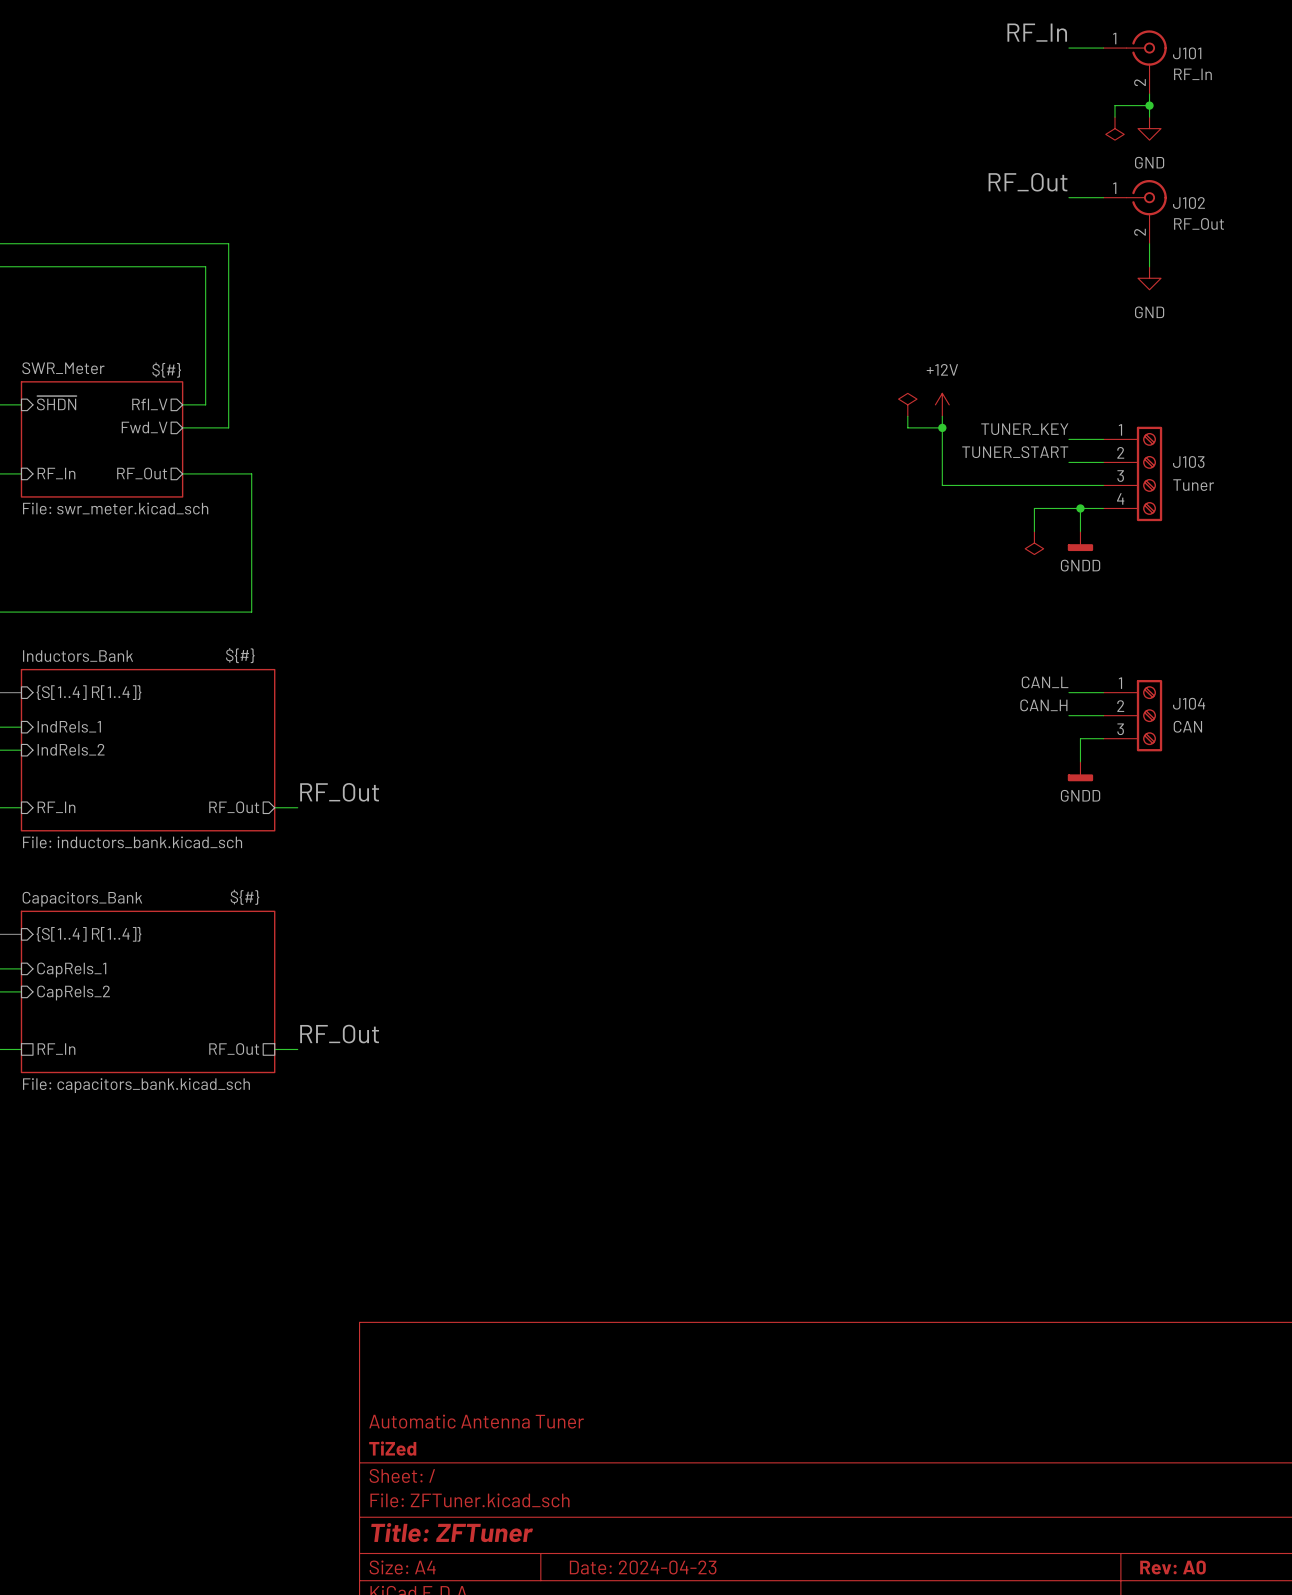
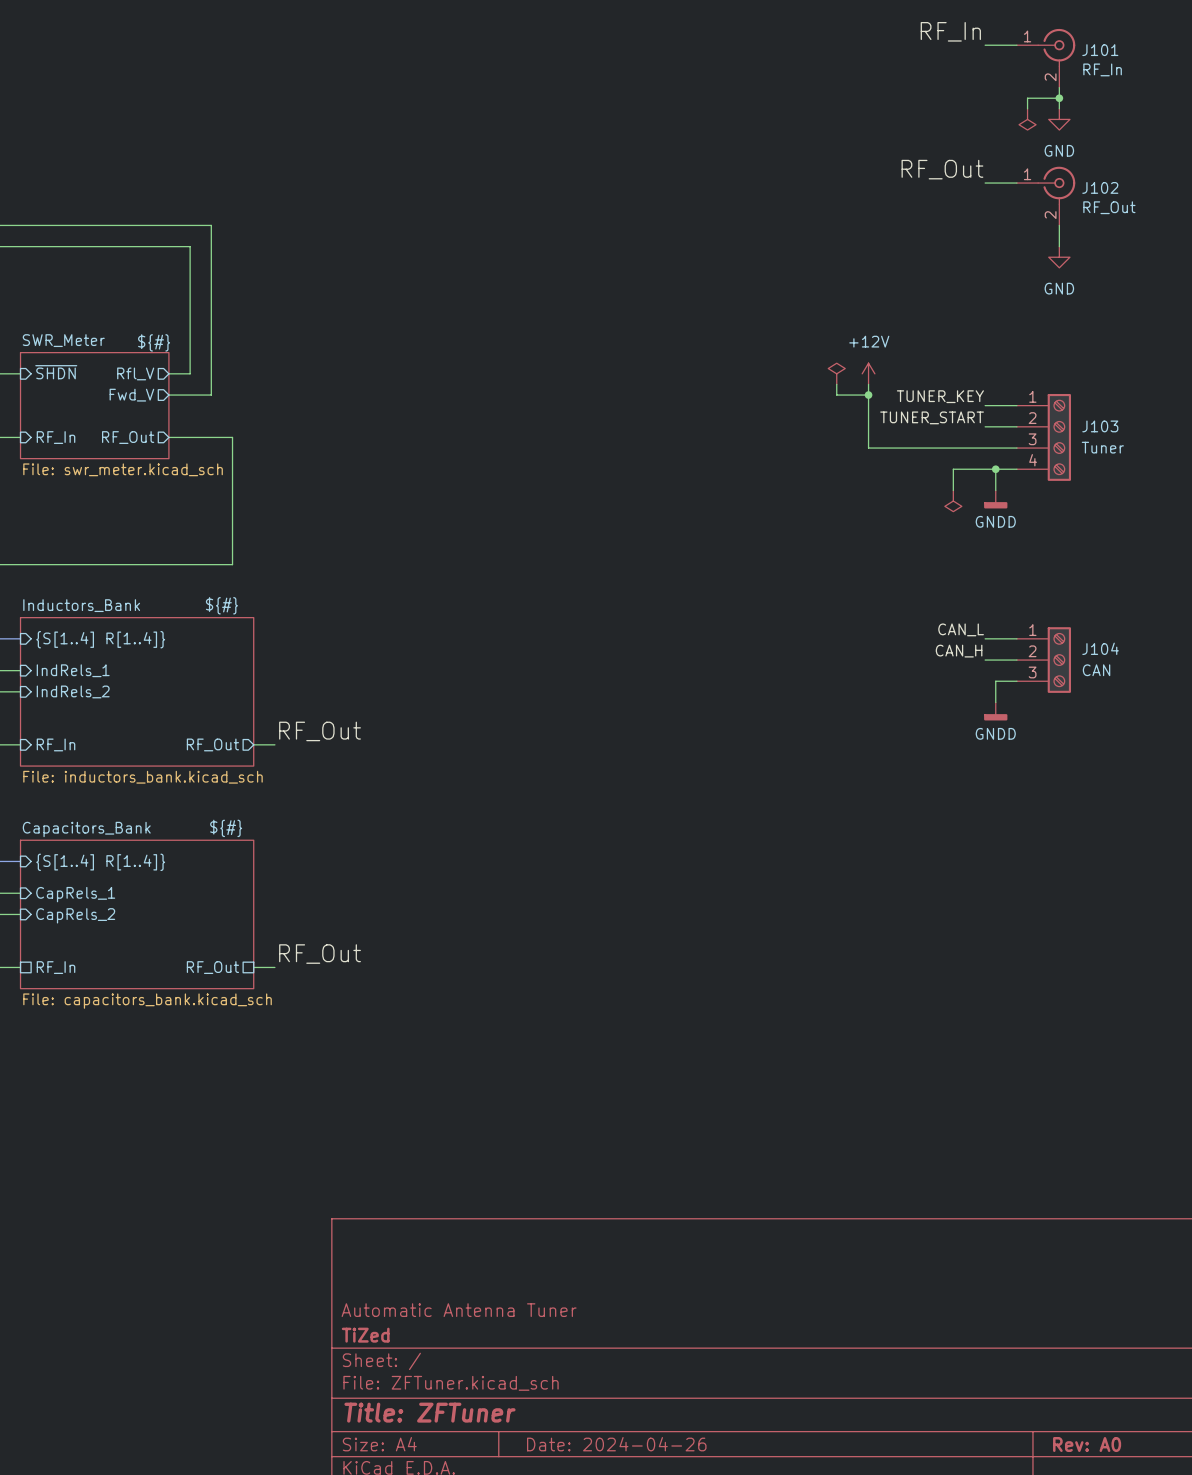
title block: Date: 2024-04-23 (643, 1567) -> Date: 2024-04-26 (616, 1444)

